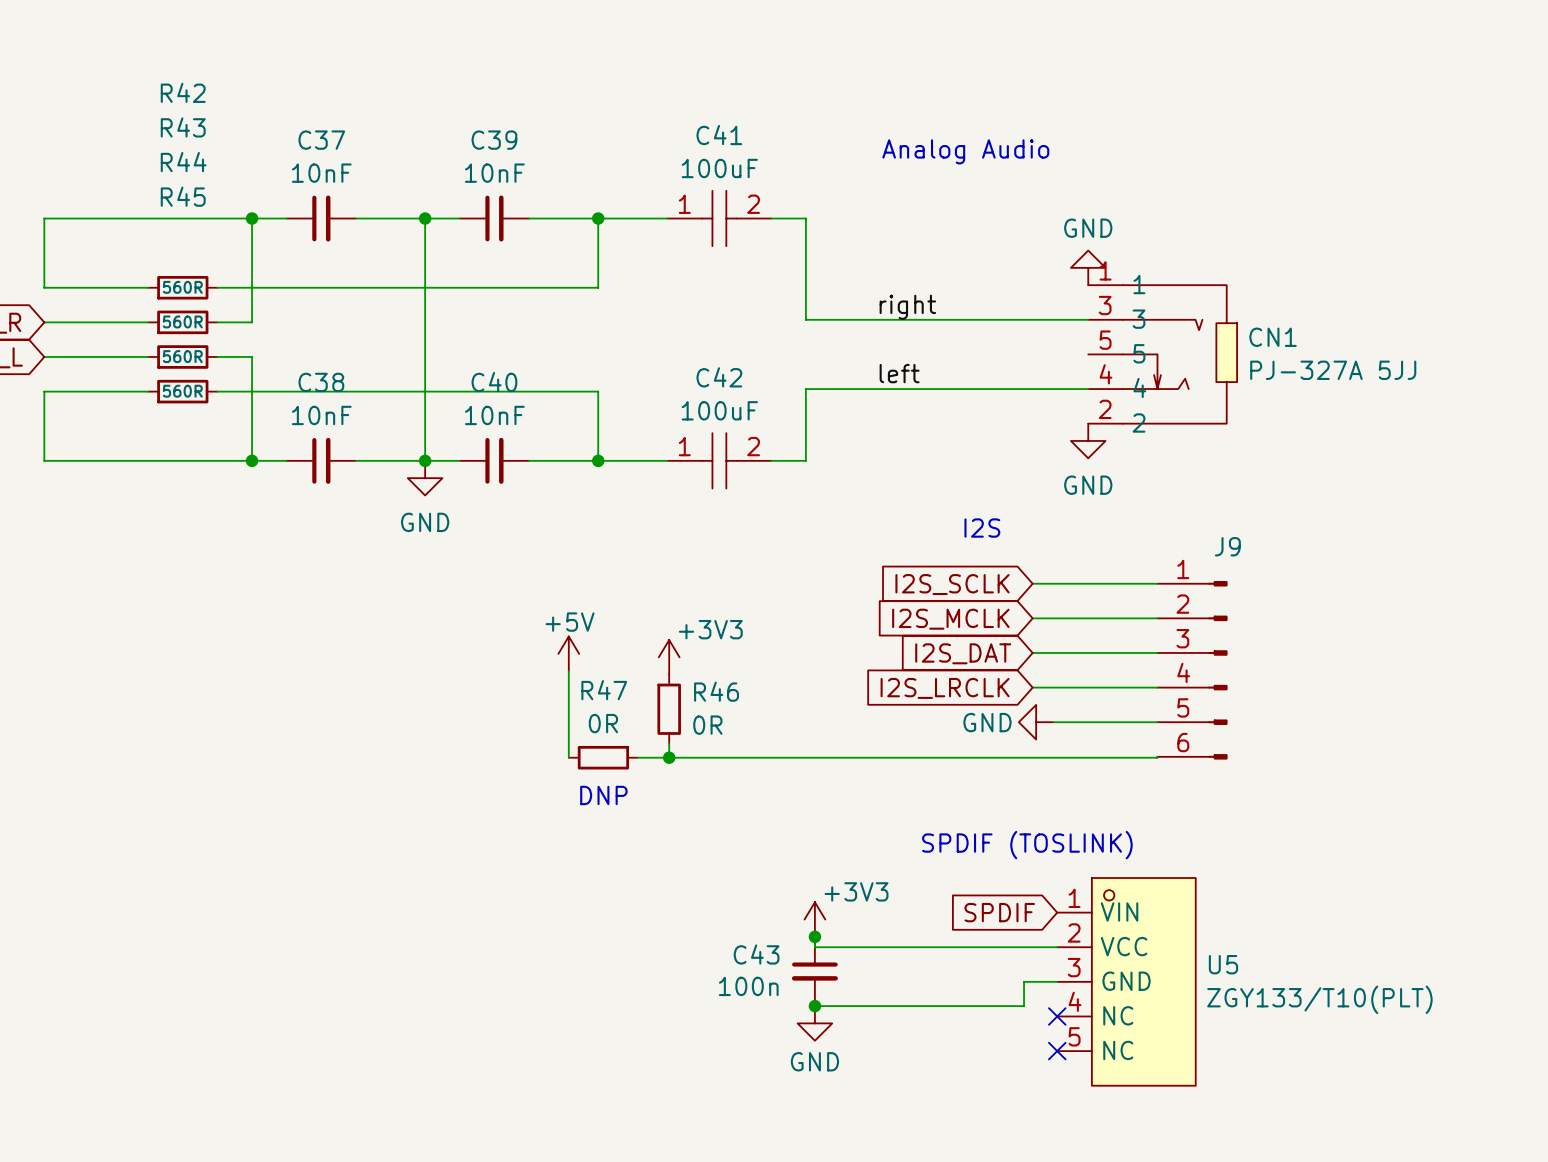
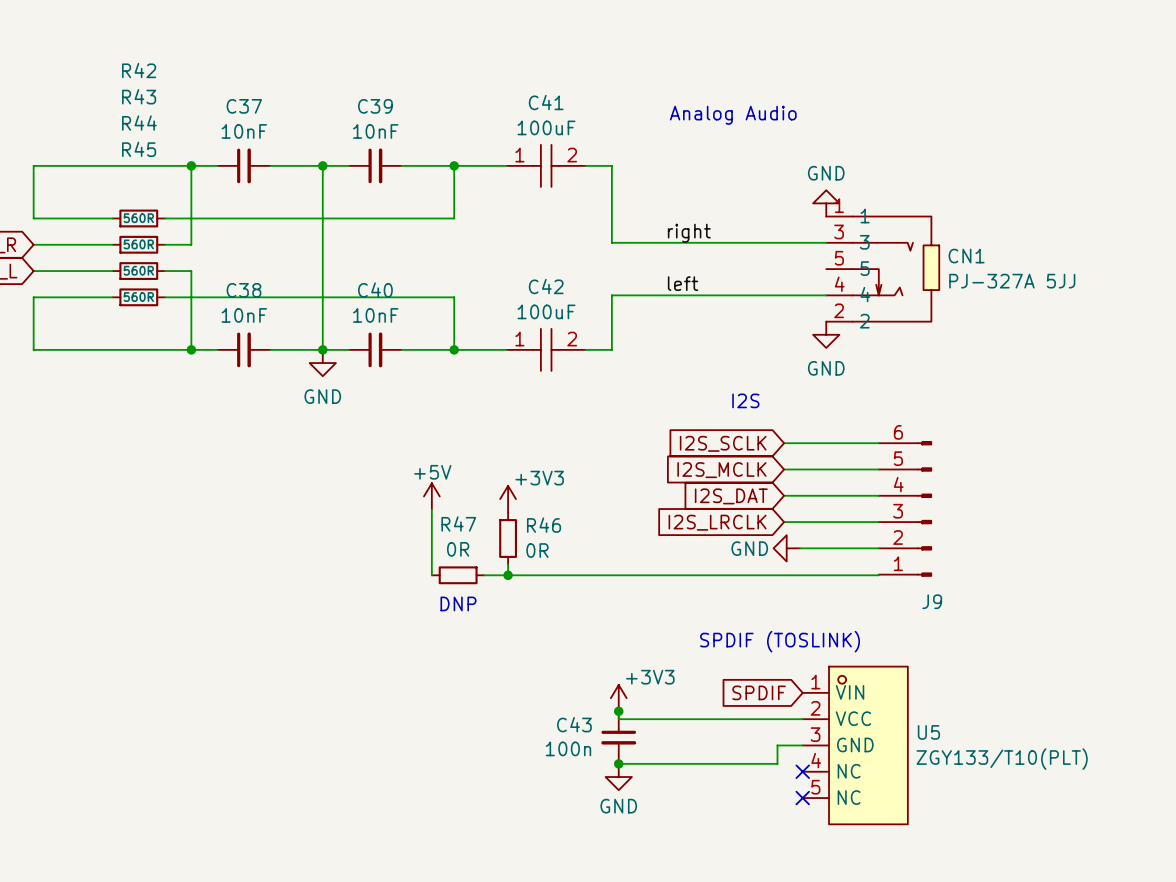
J9 flip: as is (1217, 670) -> up-down (924, 508)

